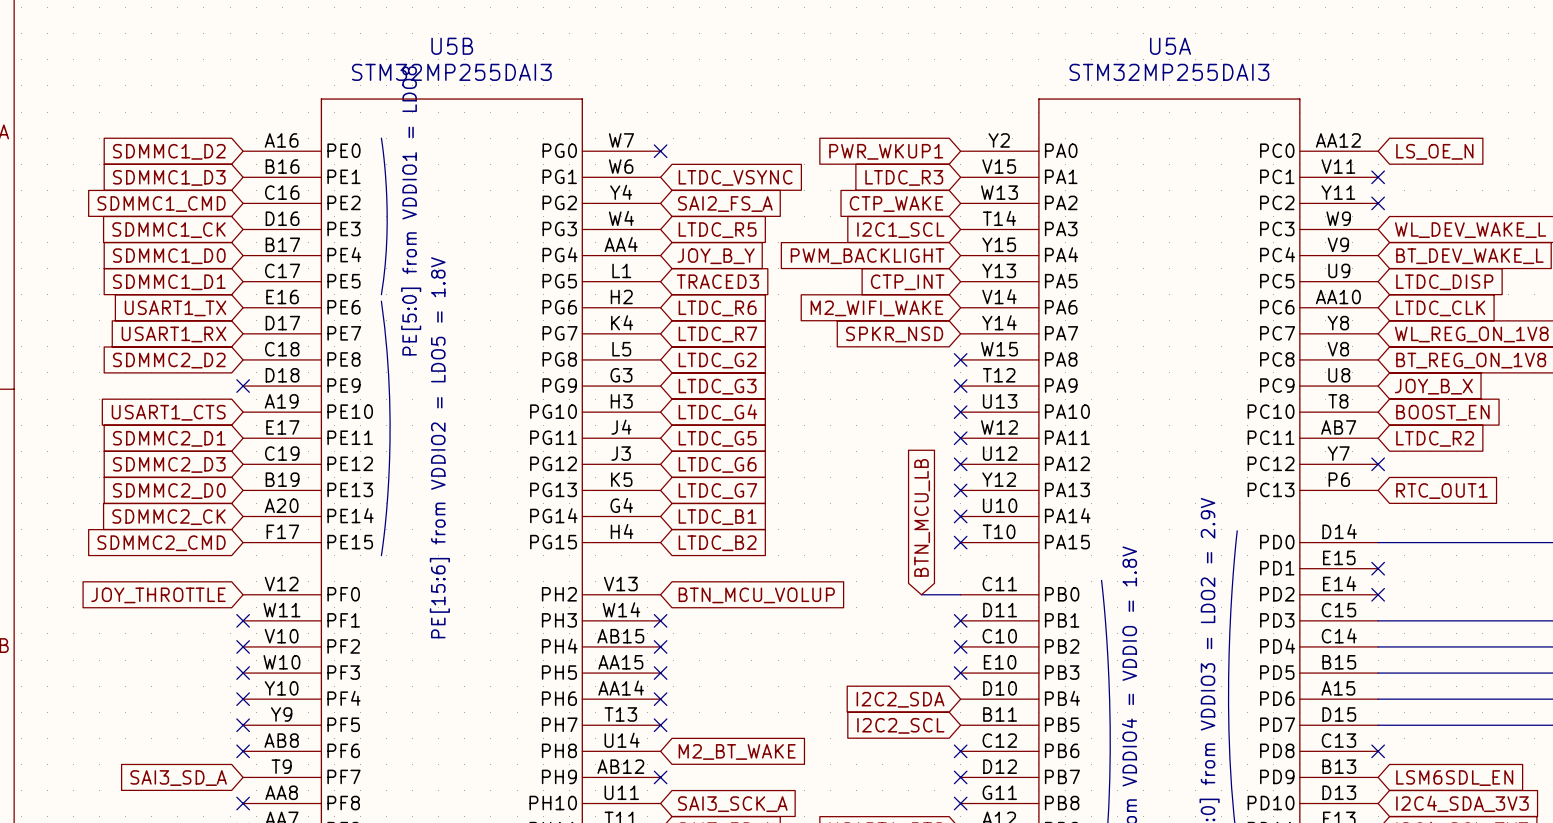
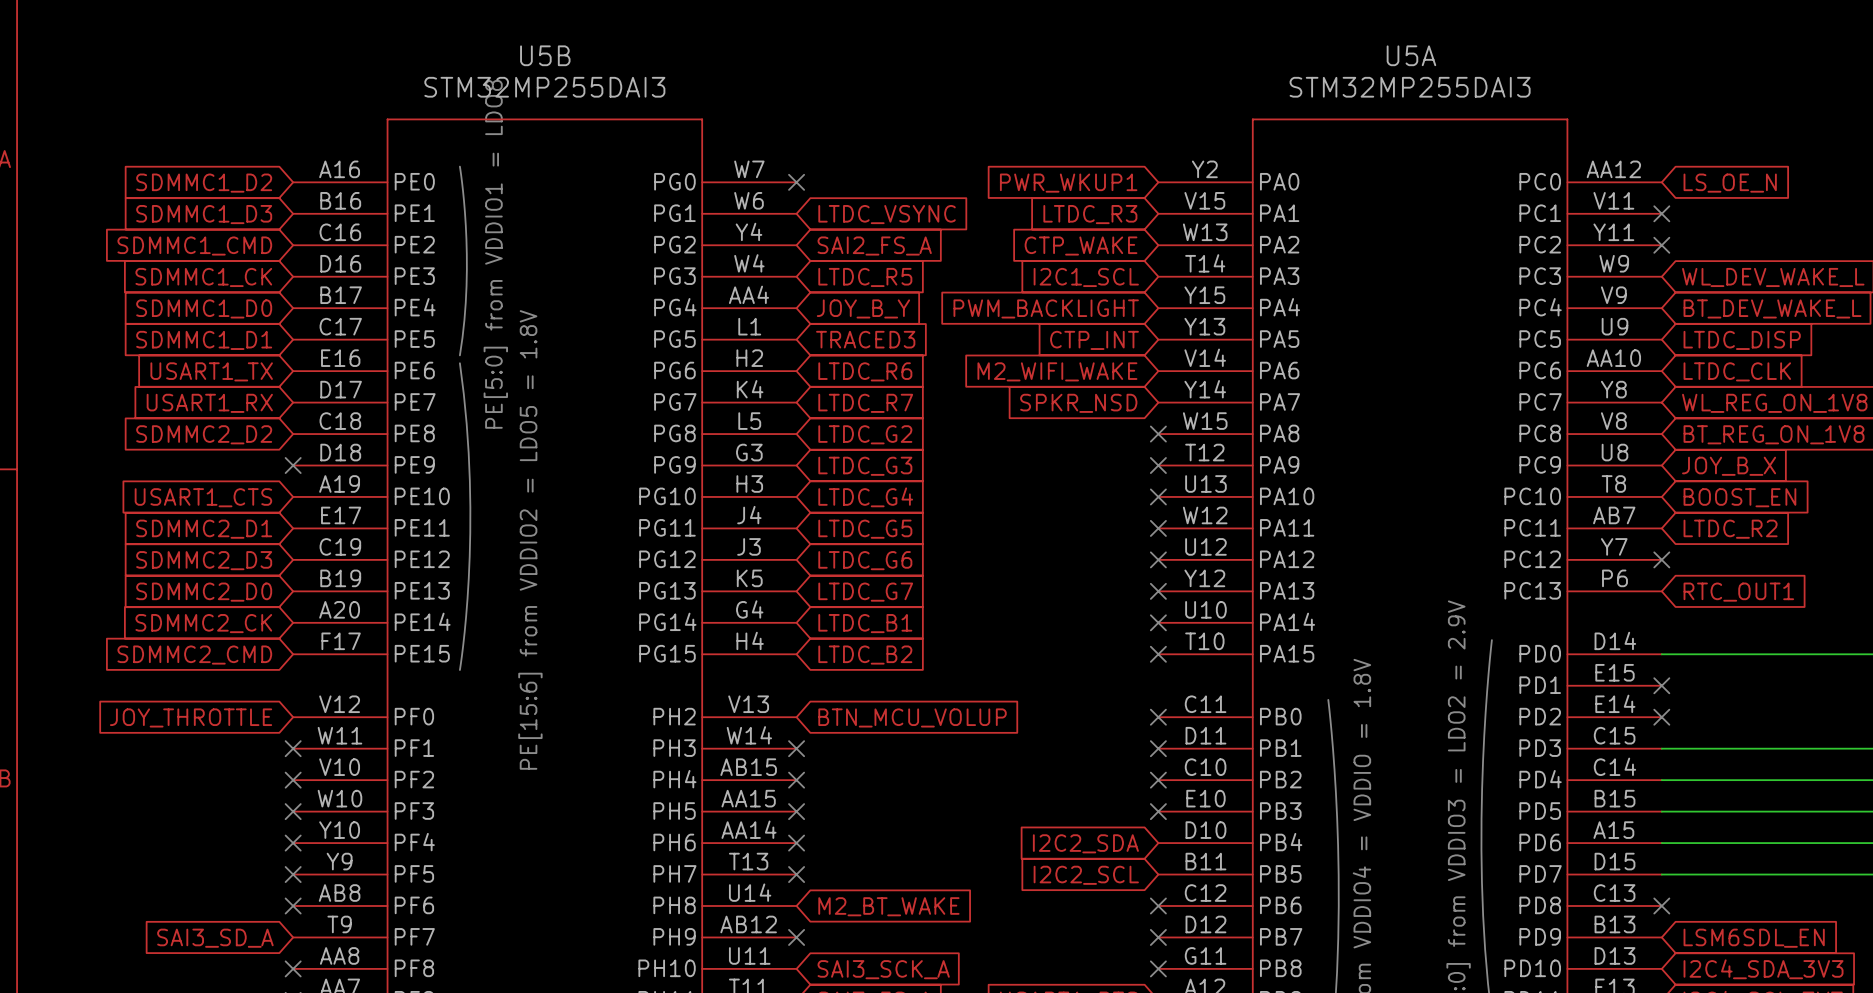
global label: BTN_MCU_LB (922, 517) -> none
wire: (921, 594) (960, 594) -> none
no-connect mark: none -> (1158, 717)

